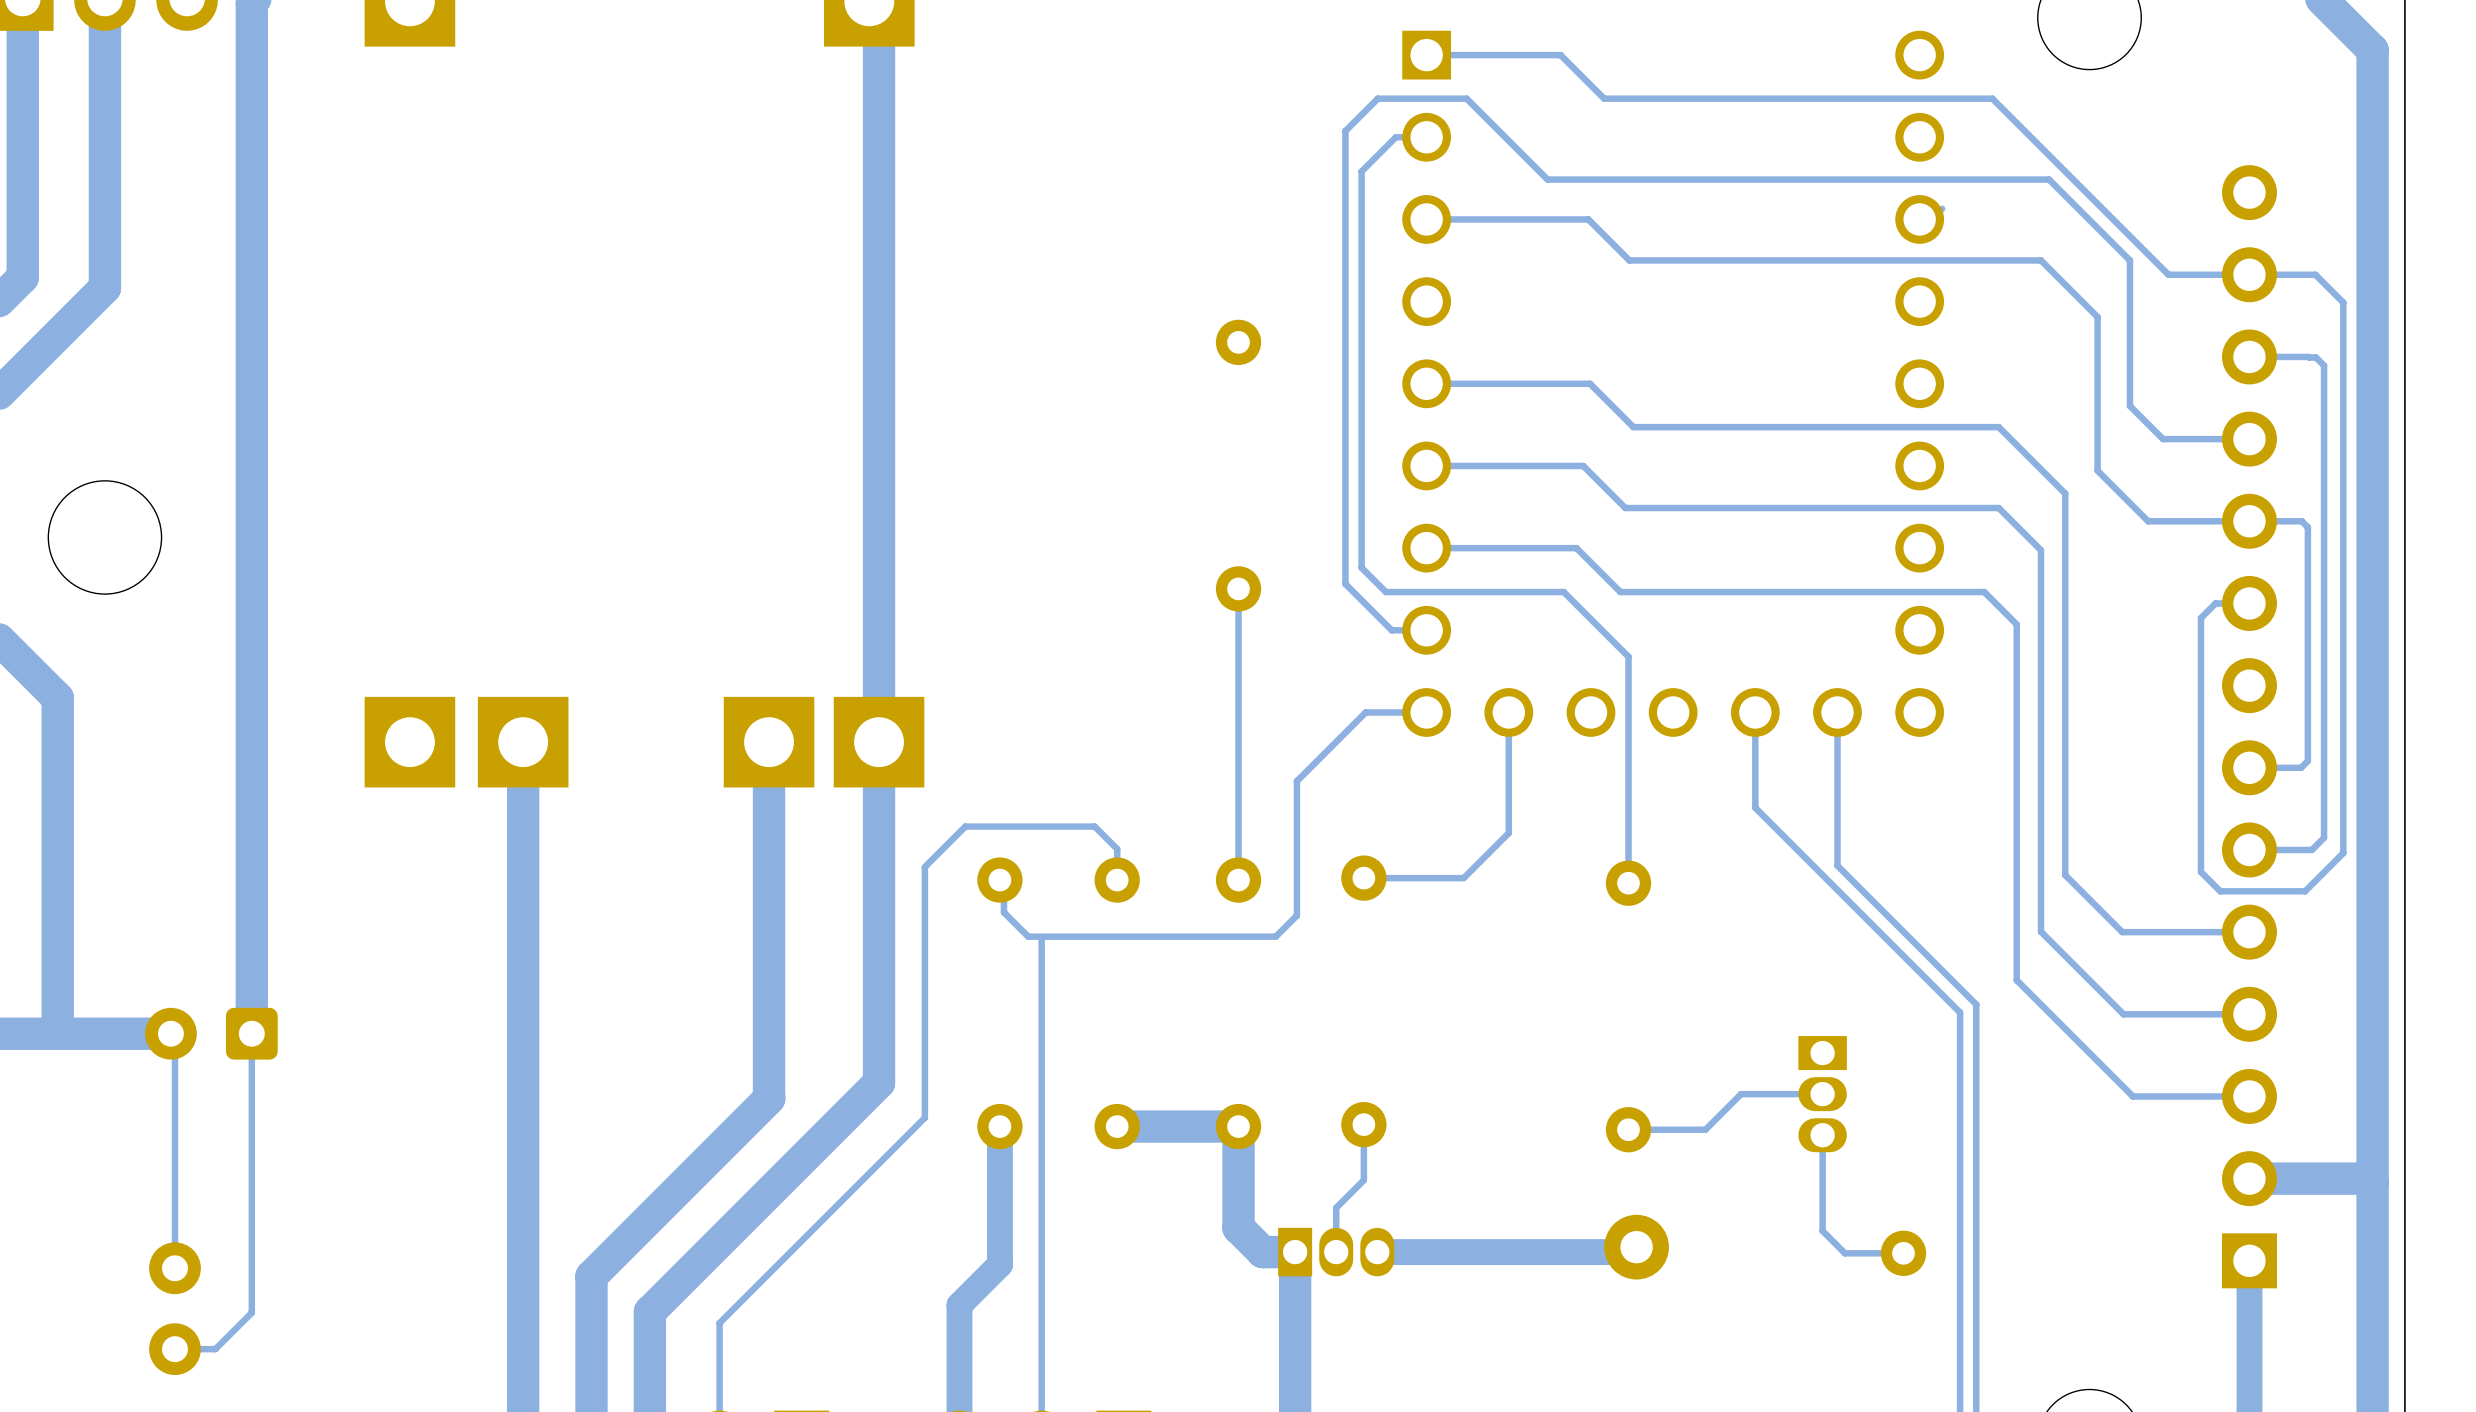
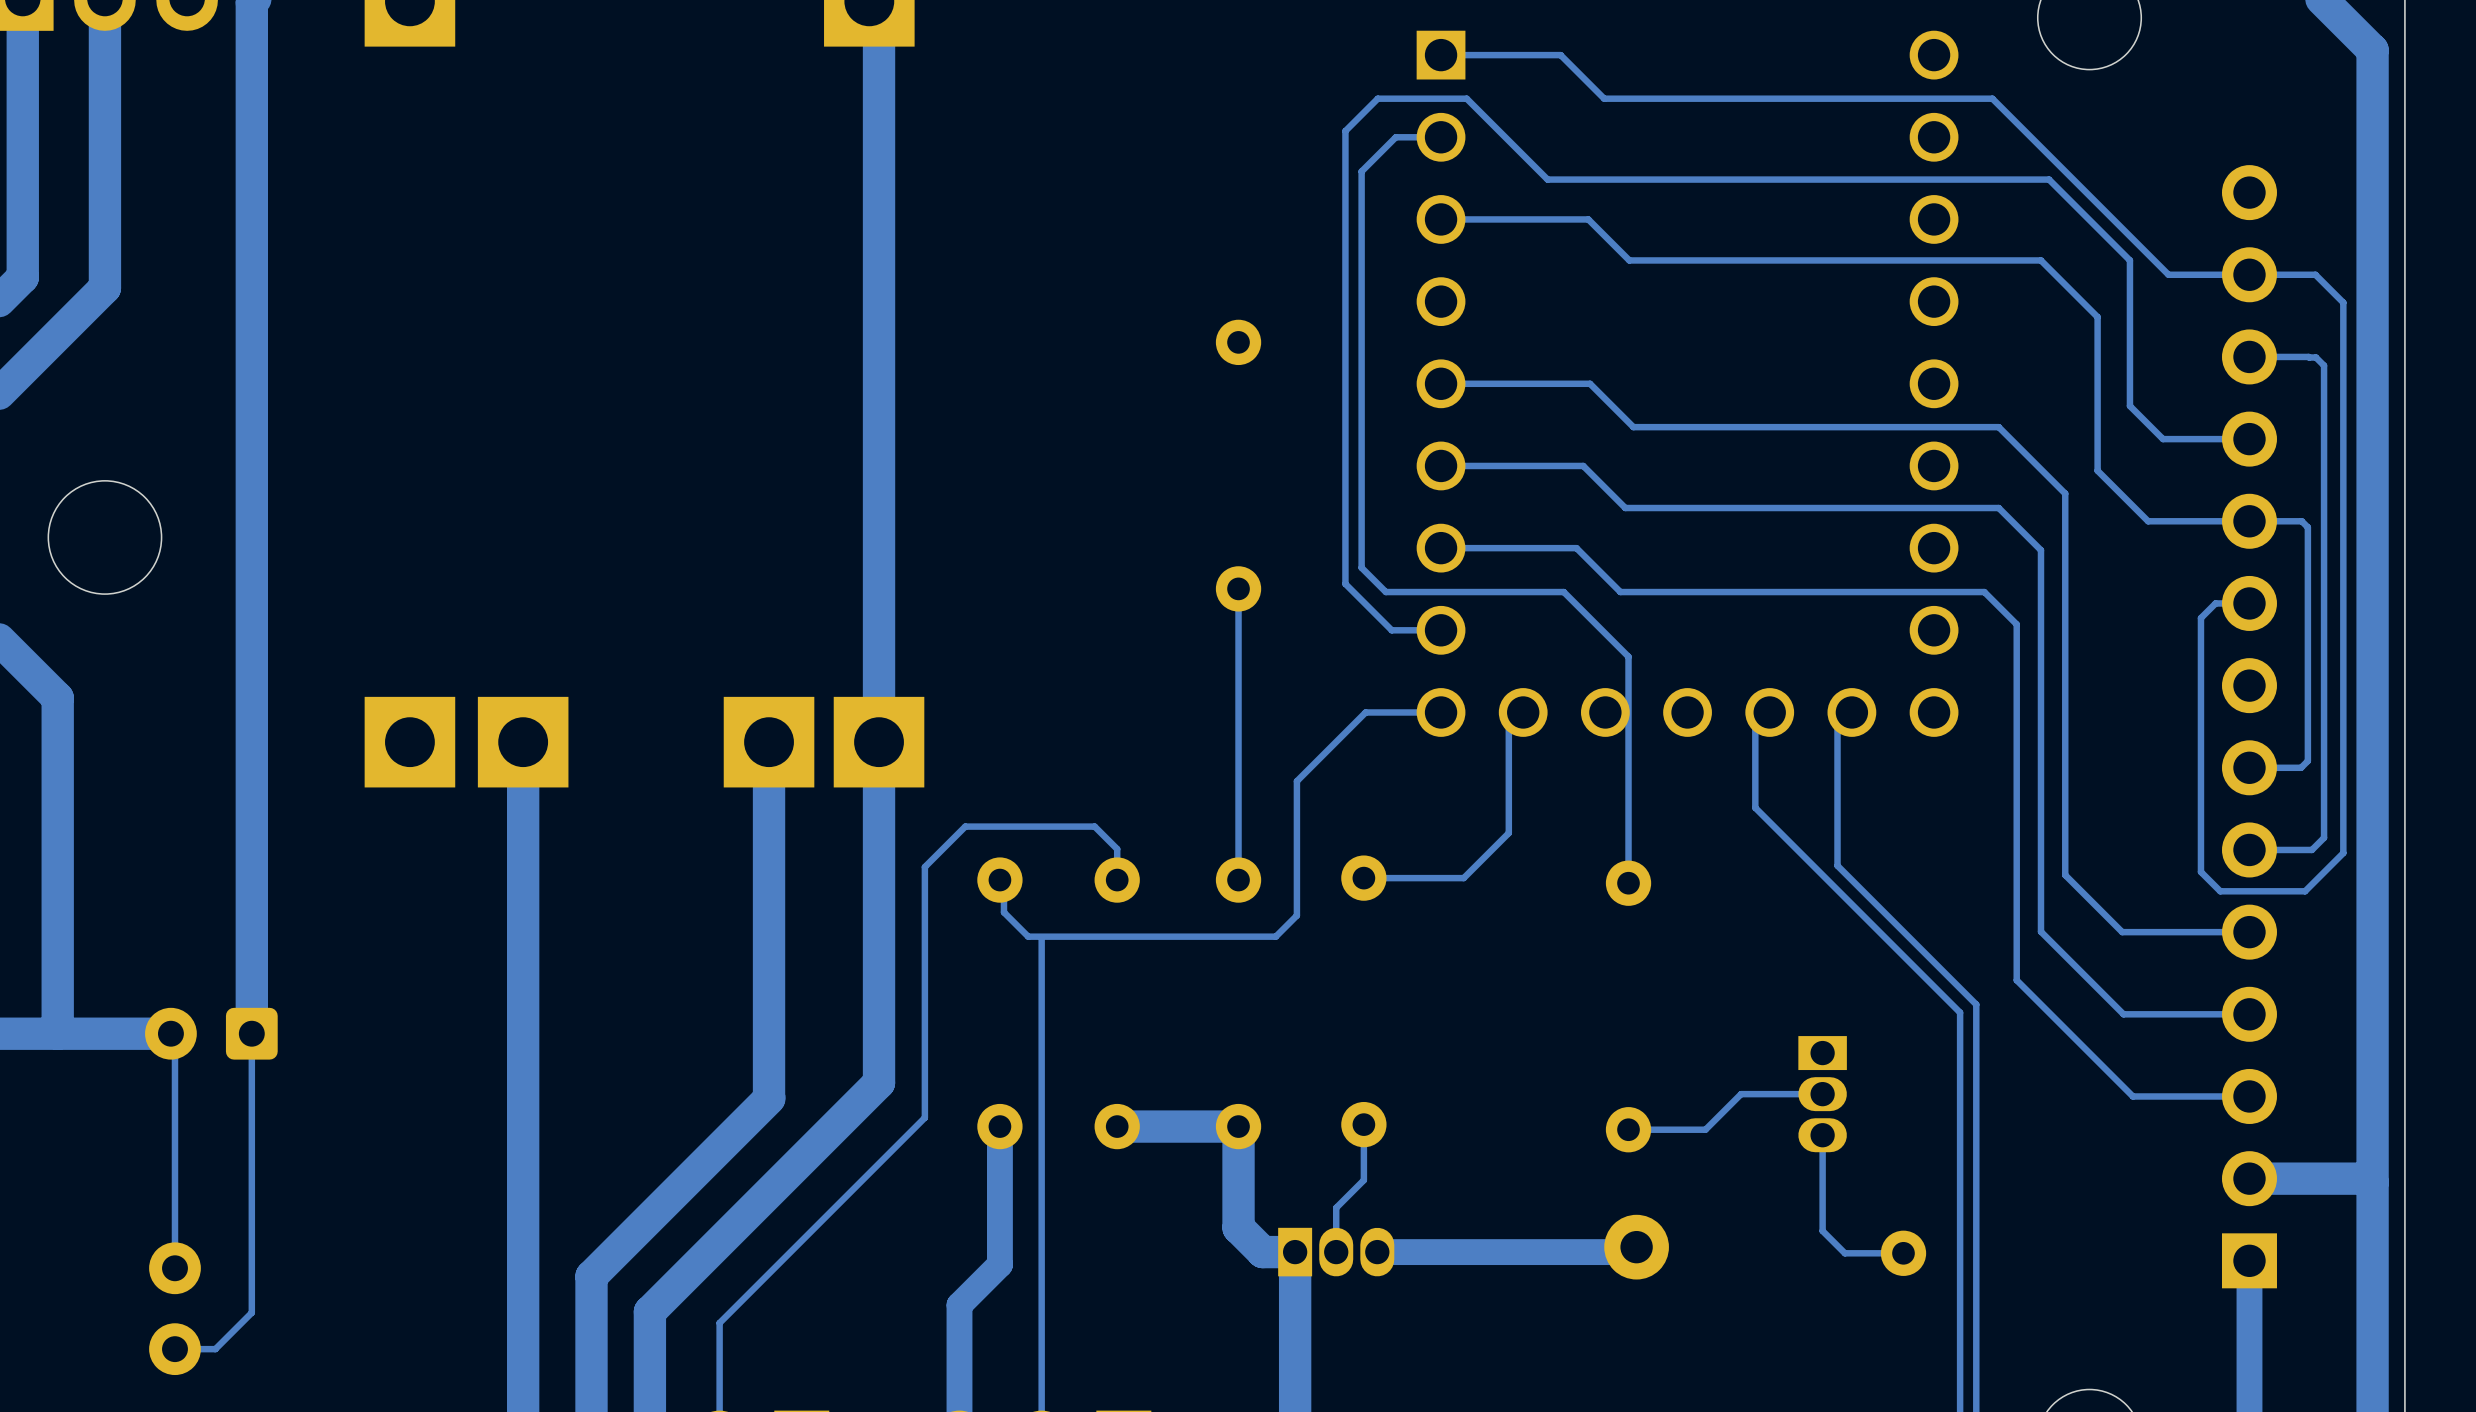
part position: (1673, 383) -> (1687, 383)

